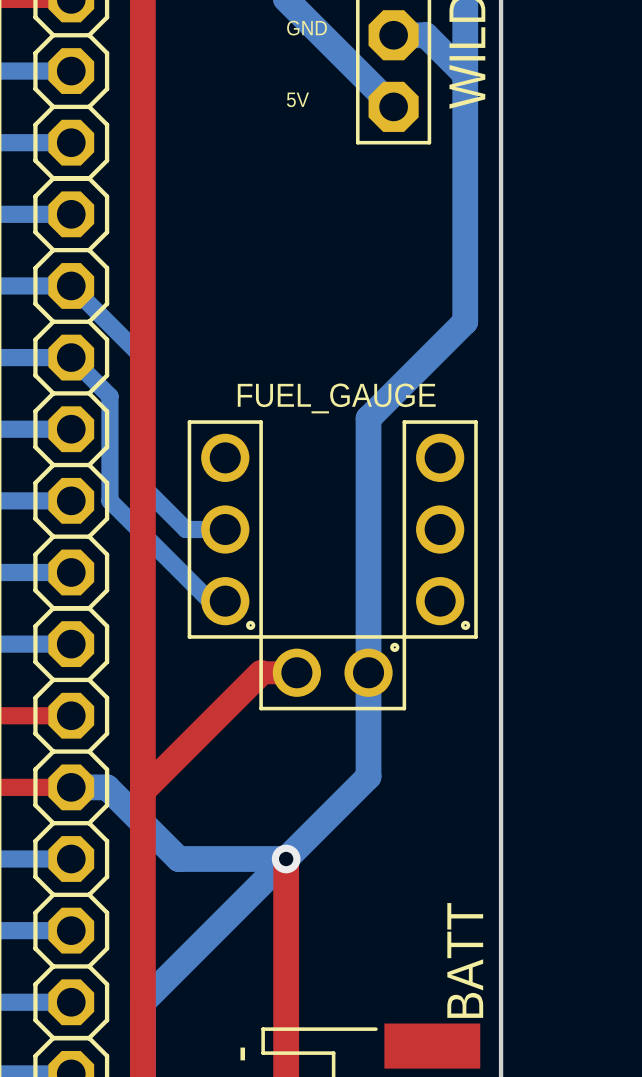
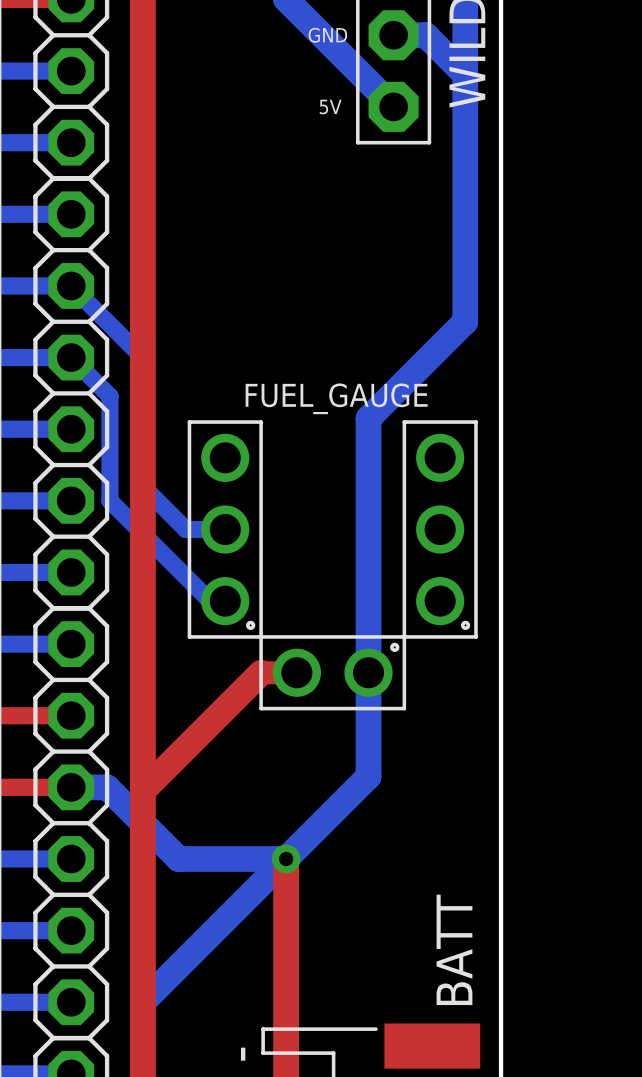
text position: GND (307, 28) -> GND (327, 35)
text position: 5V (297, 99) -> 5V (330, 107)
BATT name position: BATT (465, 960) -> BATT (454, 949)

